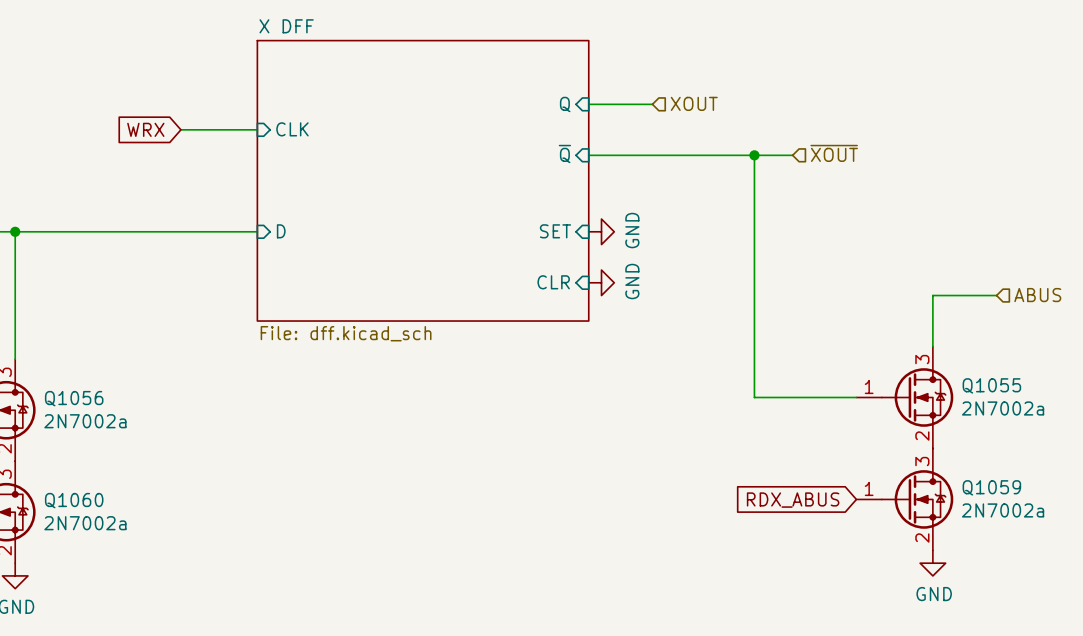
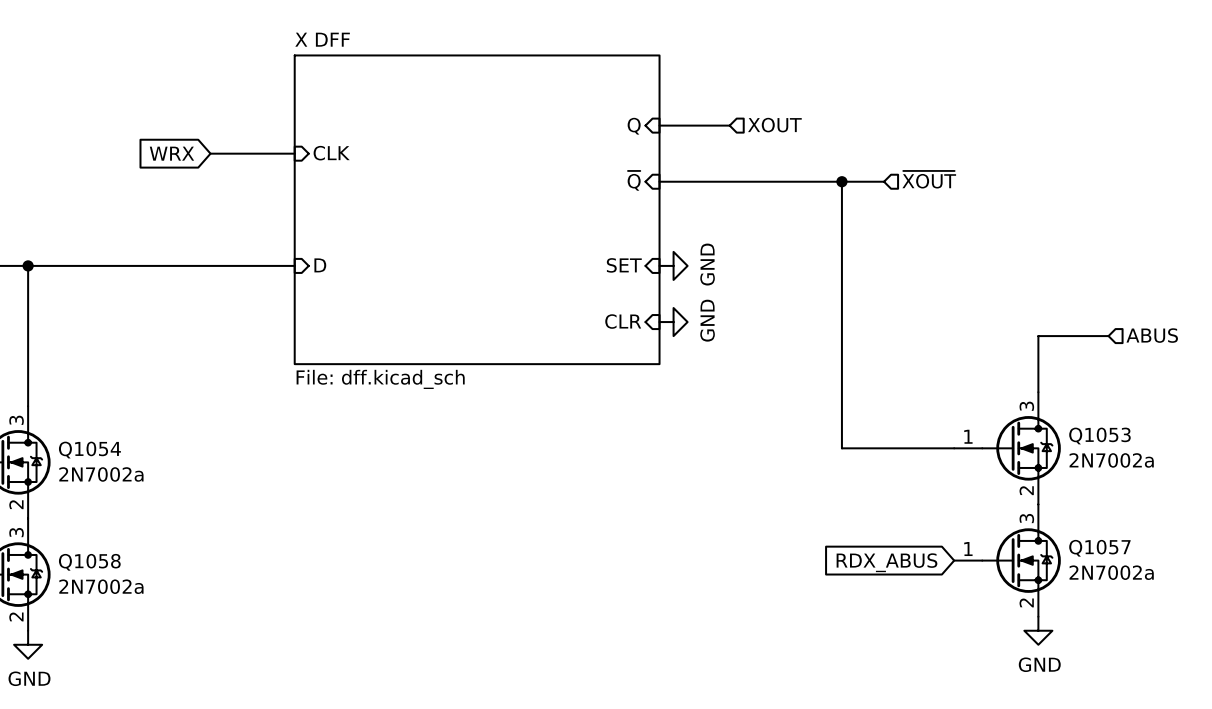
Q1055 name: Q1055 (991, 385) -> Q1053 (1099, 436)
Q1056 name: Q1056 (74, 398) -> Q1054 (89, 450)
Q1059 name: Q1059 (991, 487) -> Q1057 (1099, 548)
Q1060 name: Q1060 (74, 500) -> Q1058 (89, 562)

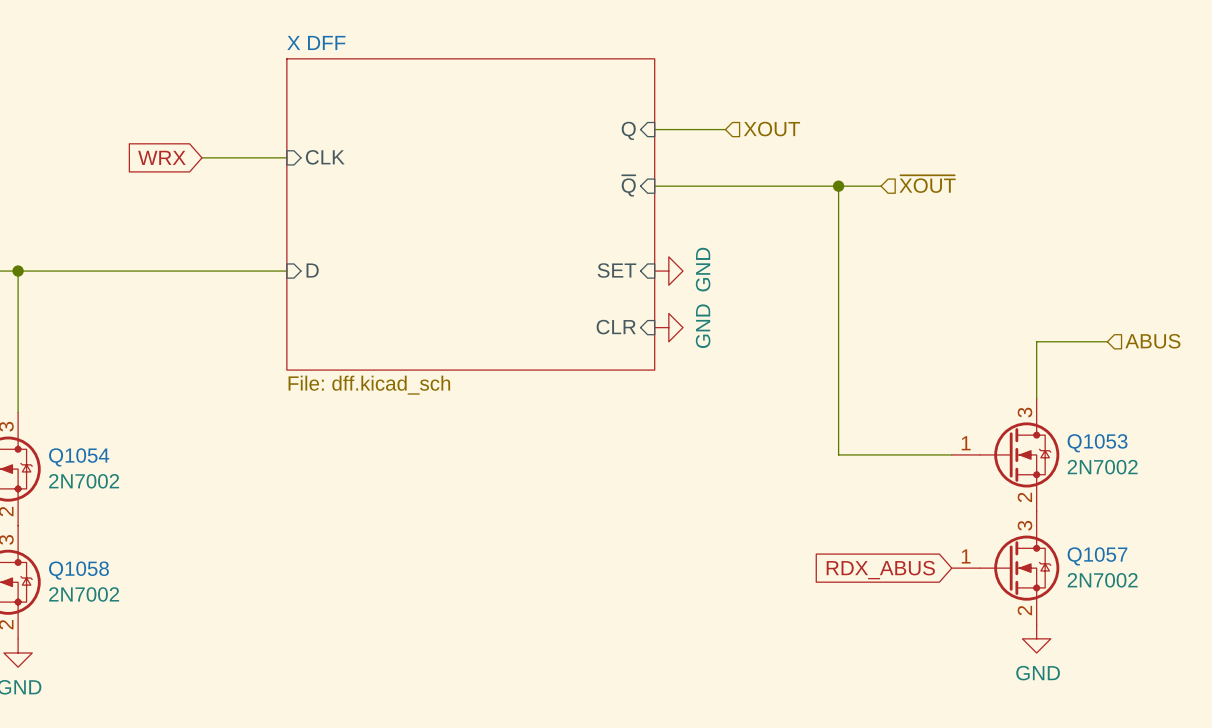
Q1053 value: 2N7002a (1111, 460) -> 2N7002 (1102, 467)
Q1054 value: 2N7002a (101, 474) -> 2N7002 (84, 481)
Q1057 value: 2N7002a (1111, 572) -> 2N7002 (1102, 580)
Q1058 value: 2N7002a (101, 586) -> 2N7002 (84, 594)

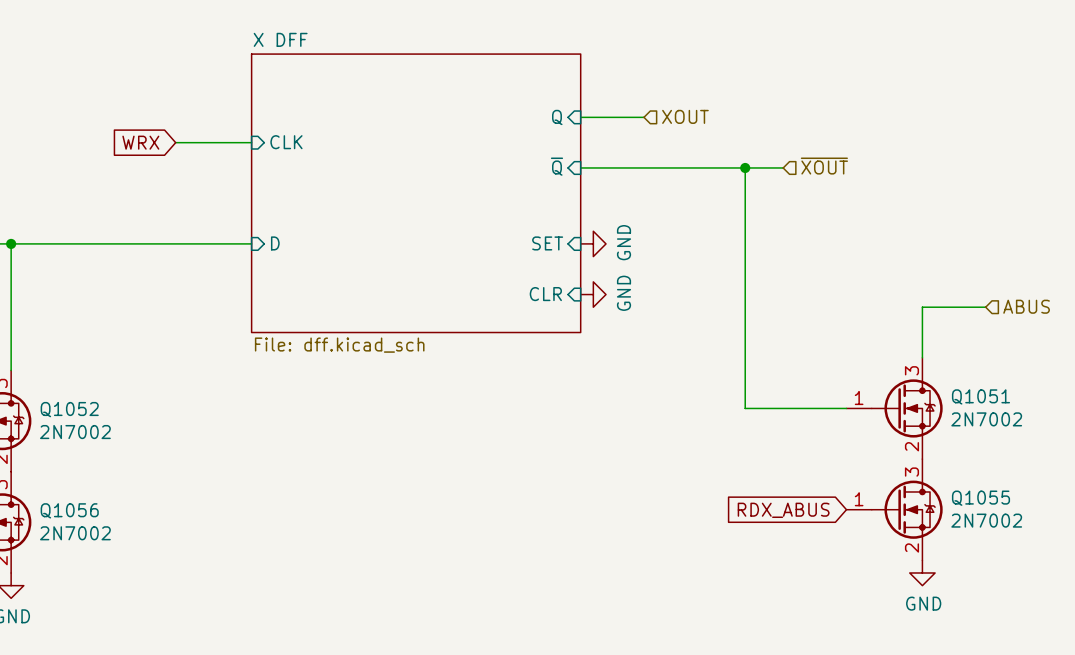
Q1053 name: Q1053 (1097, 443) -> Q1051 (980, 396)
Q1054 name: Q1054 (79, 457) -> Q1052 (69, 409)
Q1057 name: Q1057 (1097, 556) -> Q1055 (980, 498)
Q1058 name: Q1058 (78, 570) -> Q1056 (69, 510)

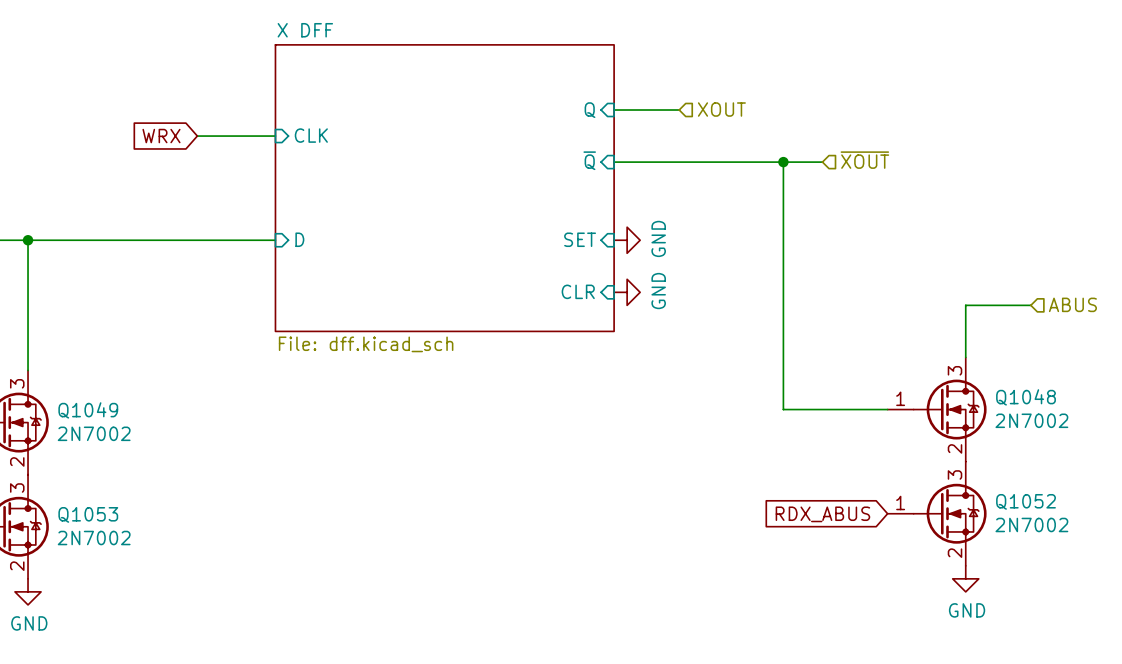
Q1051 name: Q1051 (980, 396) -> Q1048 (1026, 397)
Q1052 name: Q1052 (69, 409) -> Q1049 (88, 410)
Q1055 name: Q1055 (980, 498) -> Q1052 (1026, 501)
Q1056 name: Q1056 (69, 510) -> Q1053 (88, 514)

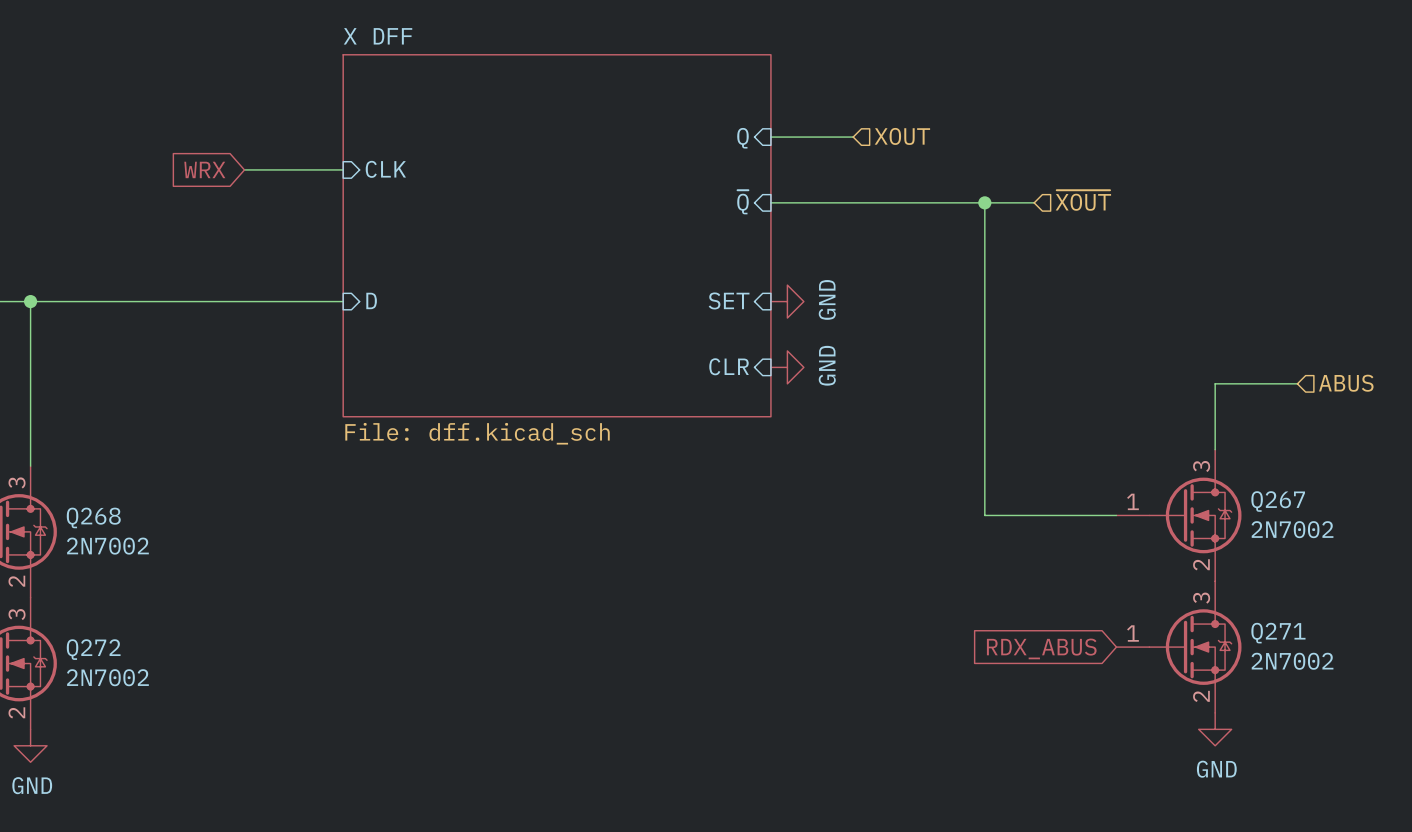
Q1048 name: Q1048 (1026, 397) -> Q267 (1278, 501)
Q1049 name: Q1049 (88, 410) -> Q268 (93, 517)
Q1052 name: Q1052 (1026, 501) -> Q271 (1278, 633)
Q1053 name: Q1053 (88, 514) -> Q272 (93, 649)

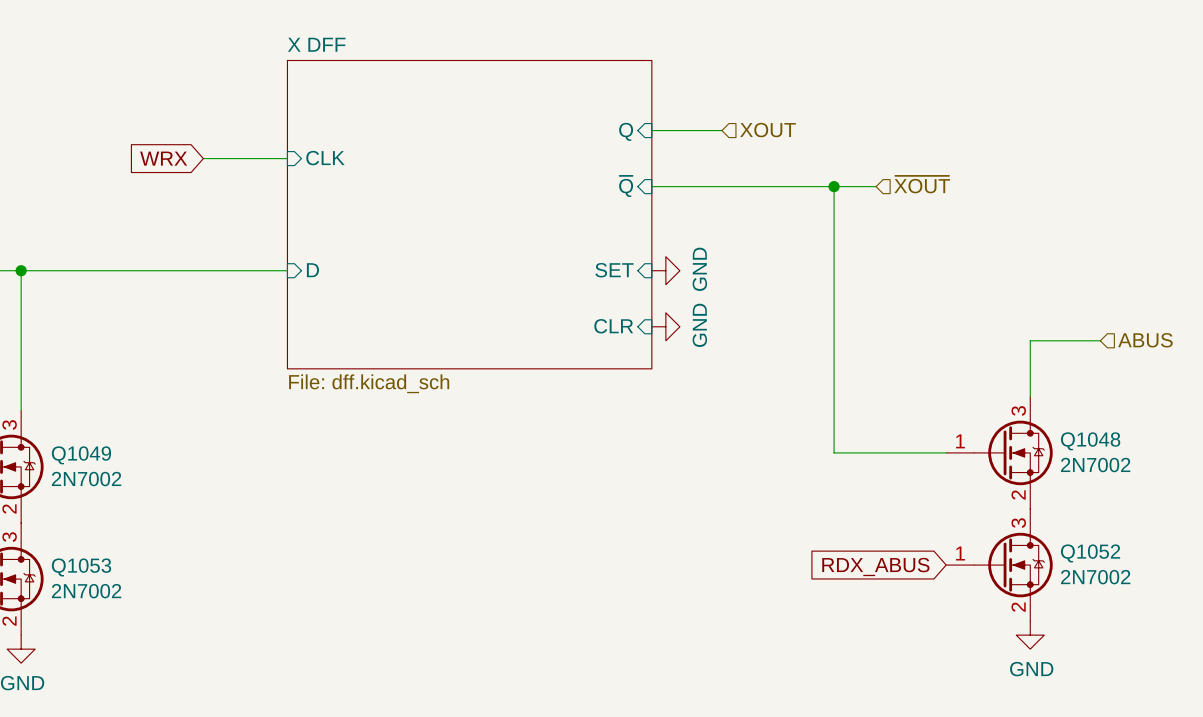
Q267 name: Q267 (1278, 501) -> Q1048 (1090, 441)
Q268 name: Q268 (93, 517) -> Q1049 (81, 455)
Q271 name: Q271 (1278, 633) -> Q1052 (1090, 553)
Q272 name: Q272 (93, 649) -> Q1053 (81, 567)

